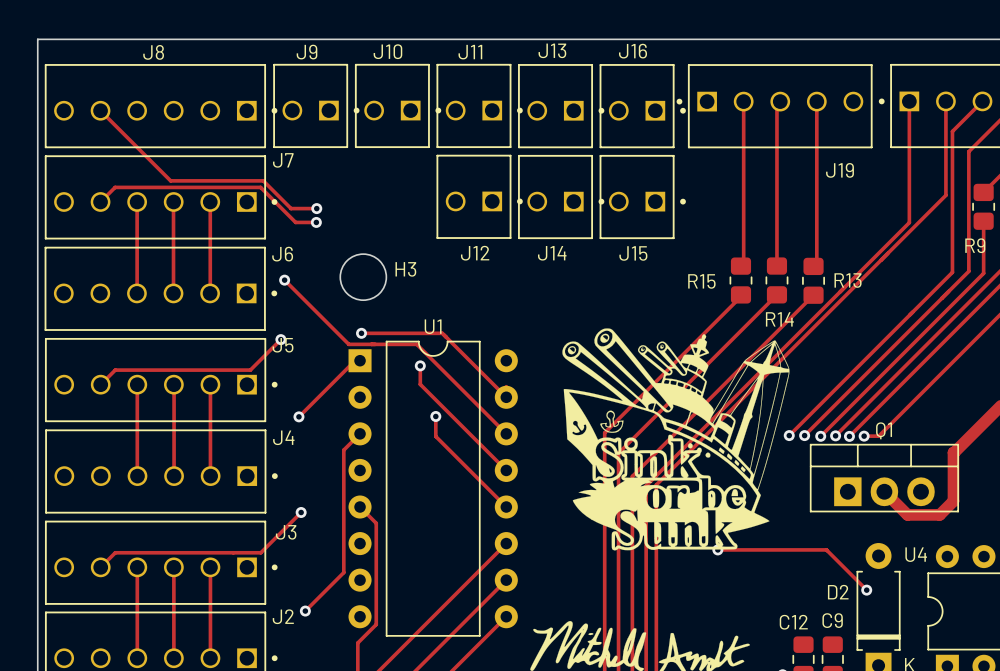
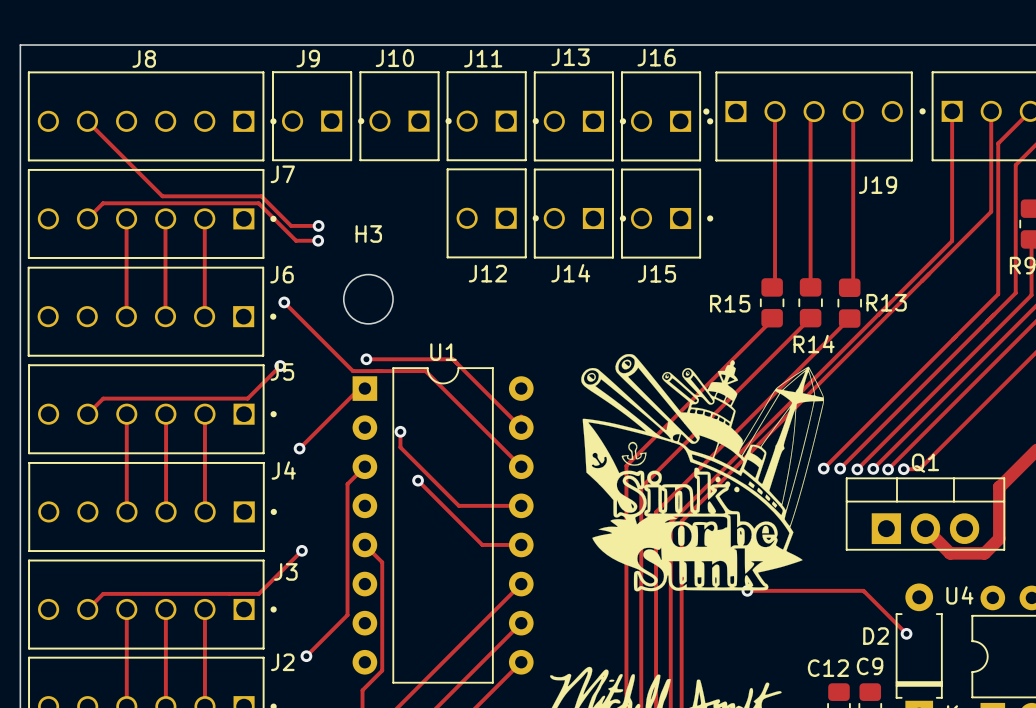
H3 name position: H3 (405, 269) -> H3 (368, 234)
track: (420, 365) (420, 384) (506, 470) -> (400, 431) (400, 447) (458, 505) (521, 505)
via: (420, 365) -> none
via: none -> (400, 431)
track: (435, 416) (435, 436) (506, 507) -> (418, 480) (482, 544) (521, 544)
via: (435, 416) -> none
via: none -> (418, 480)

